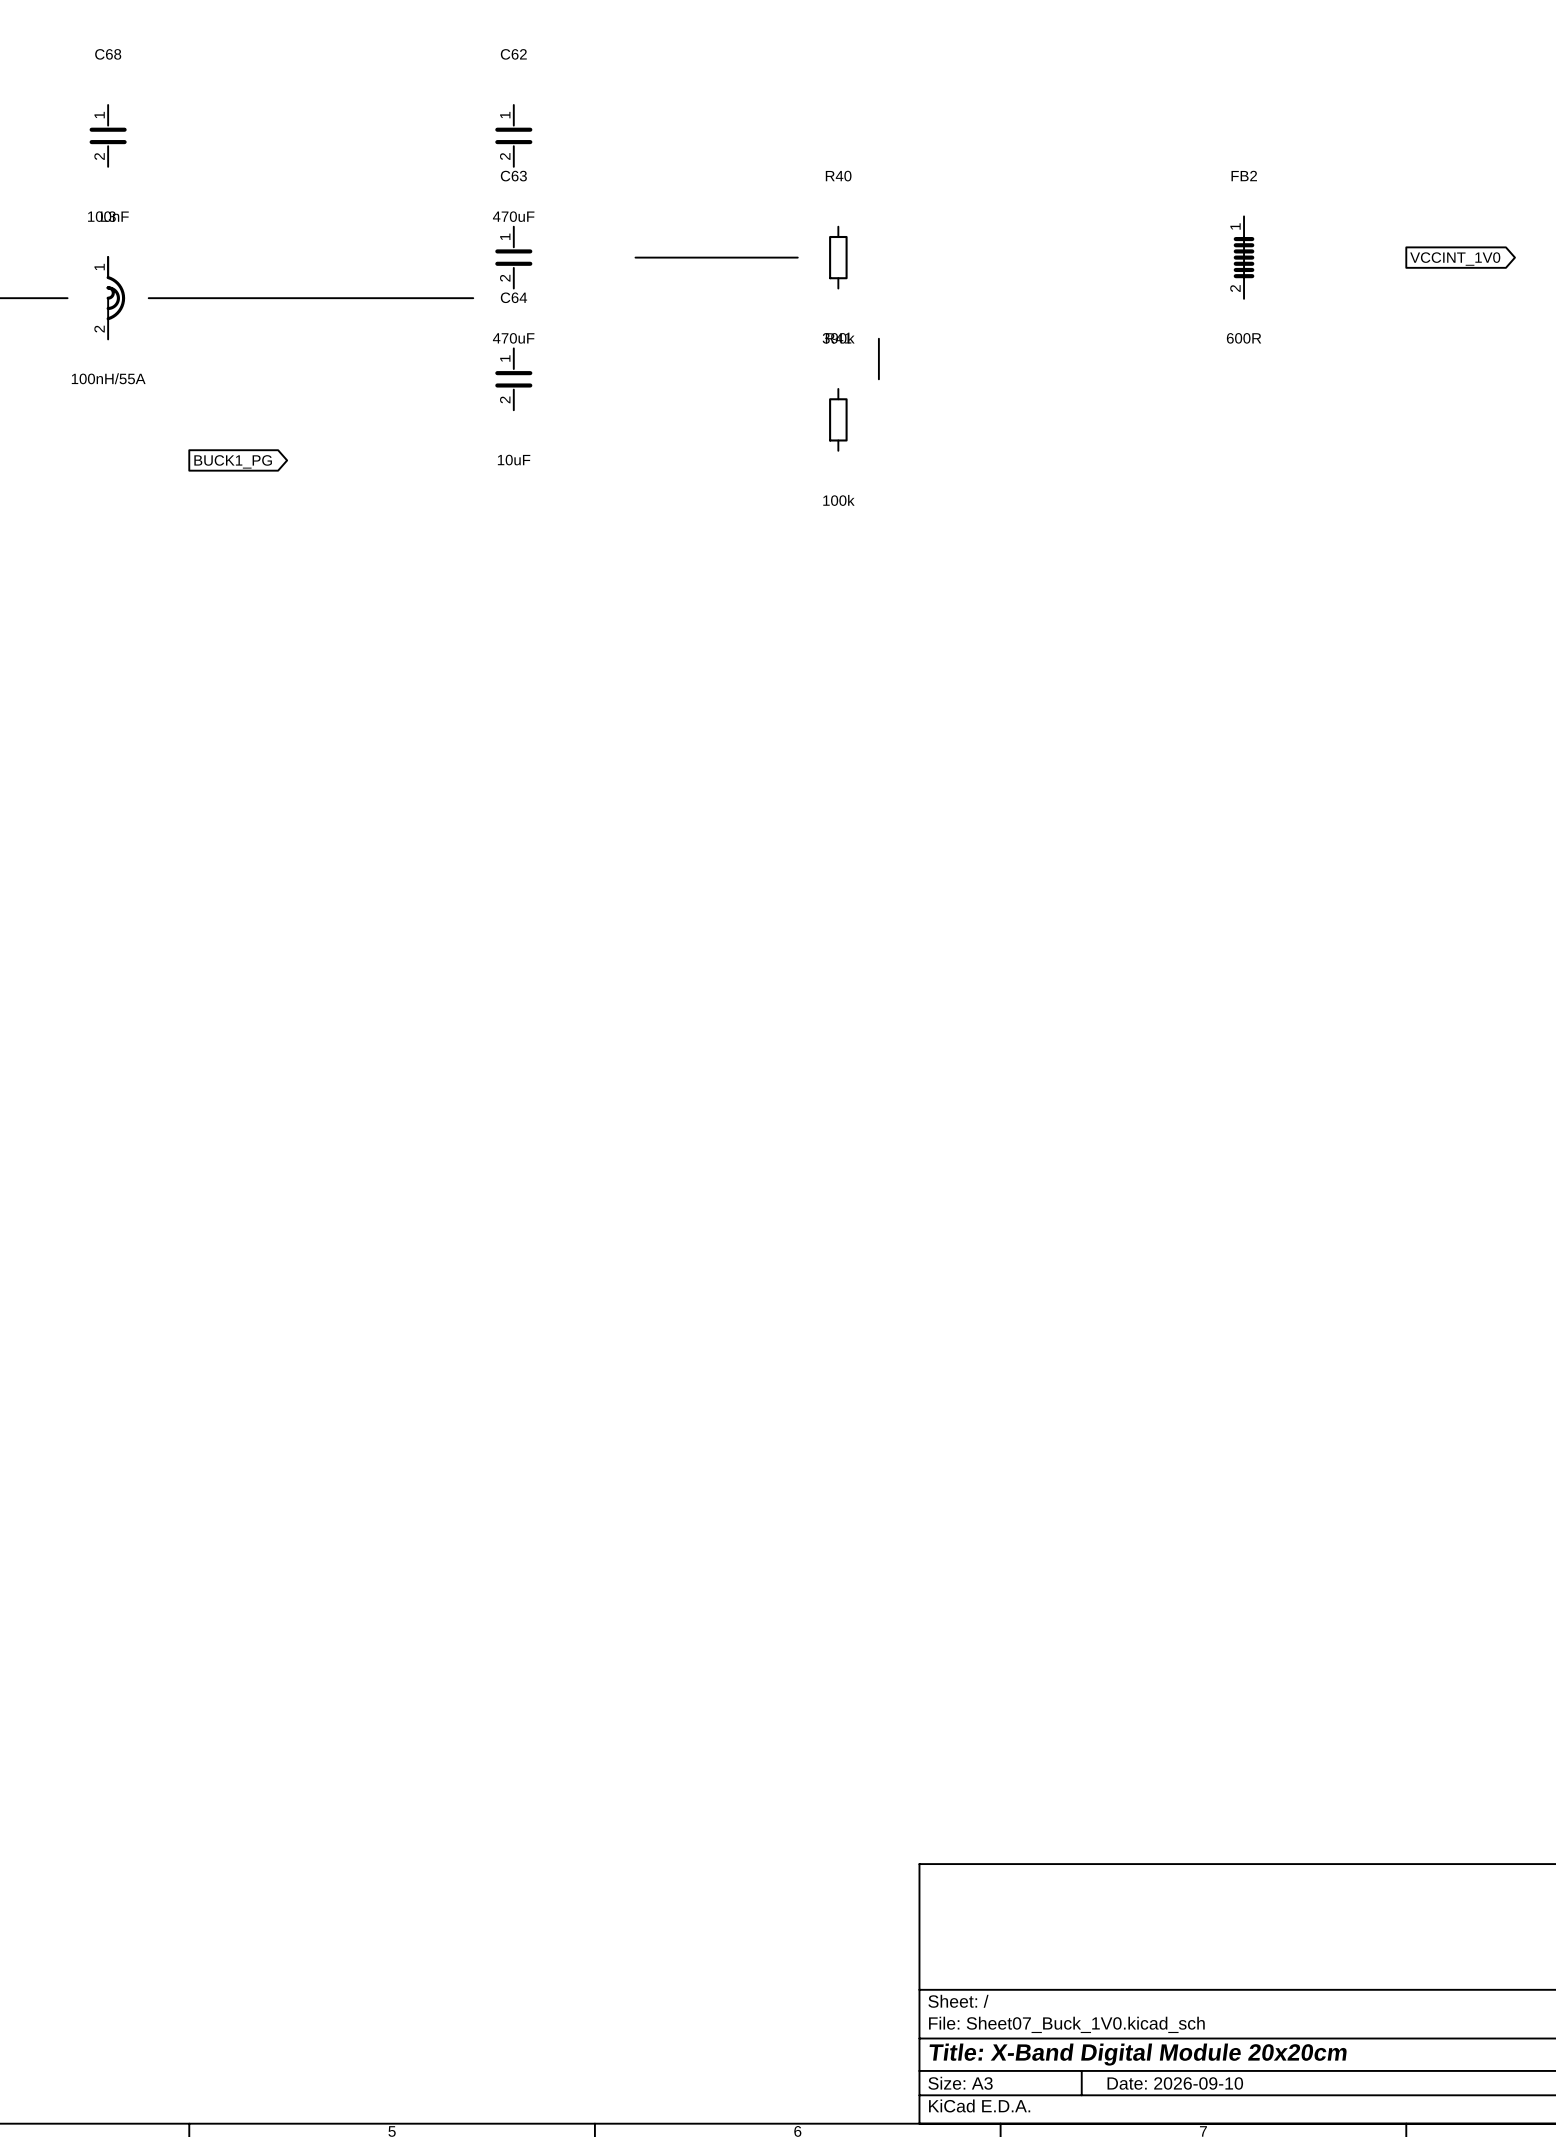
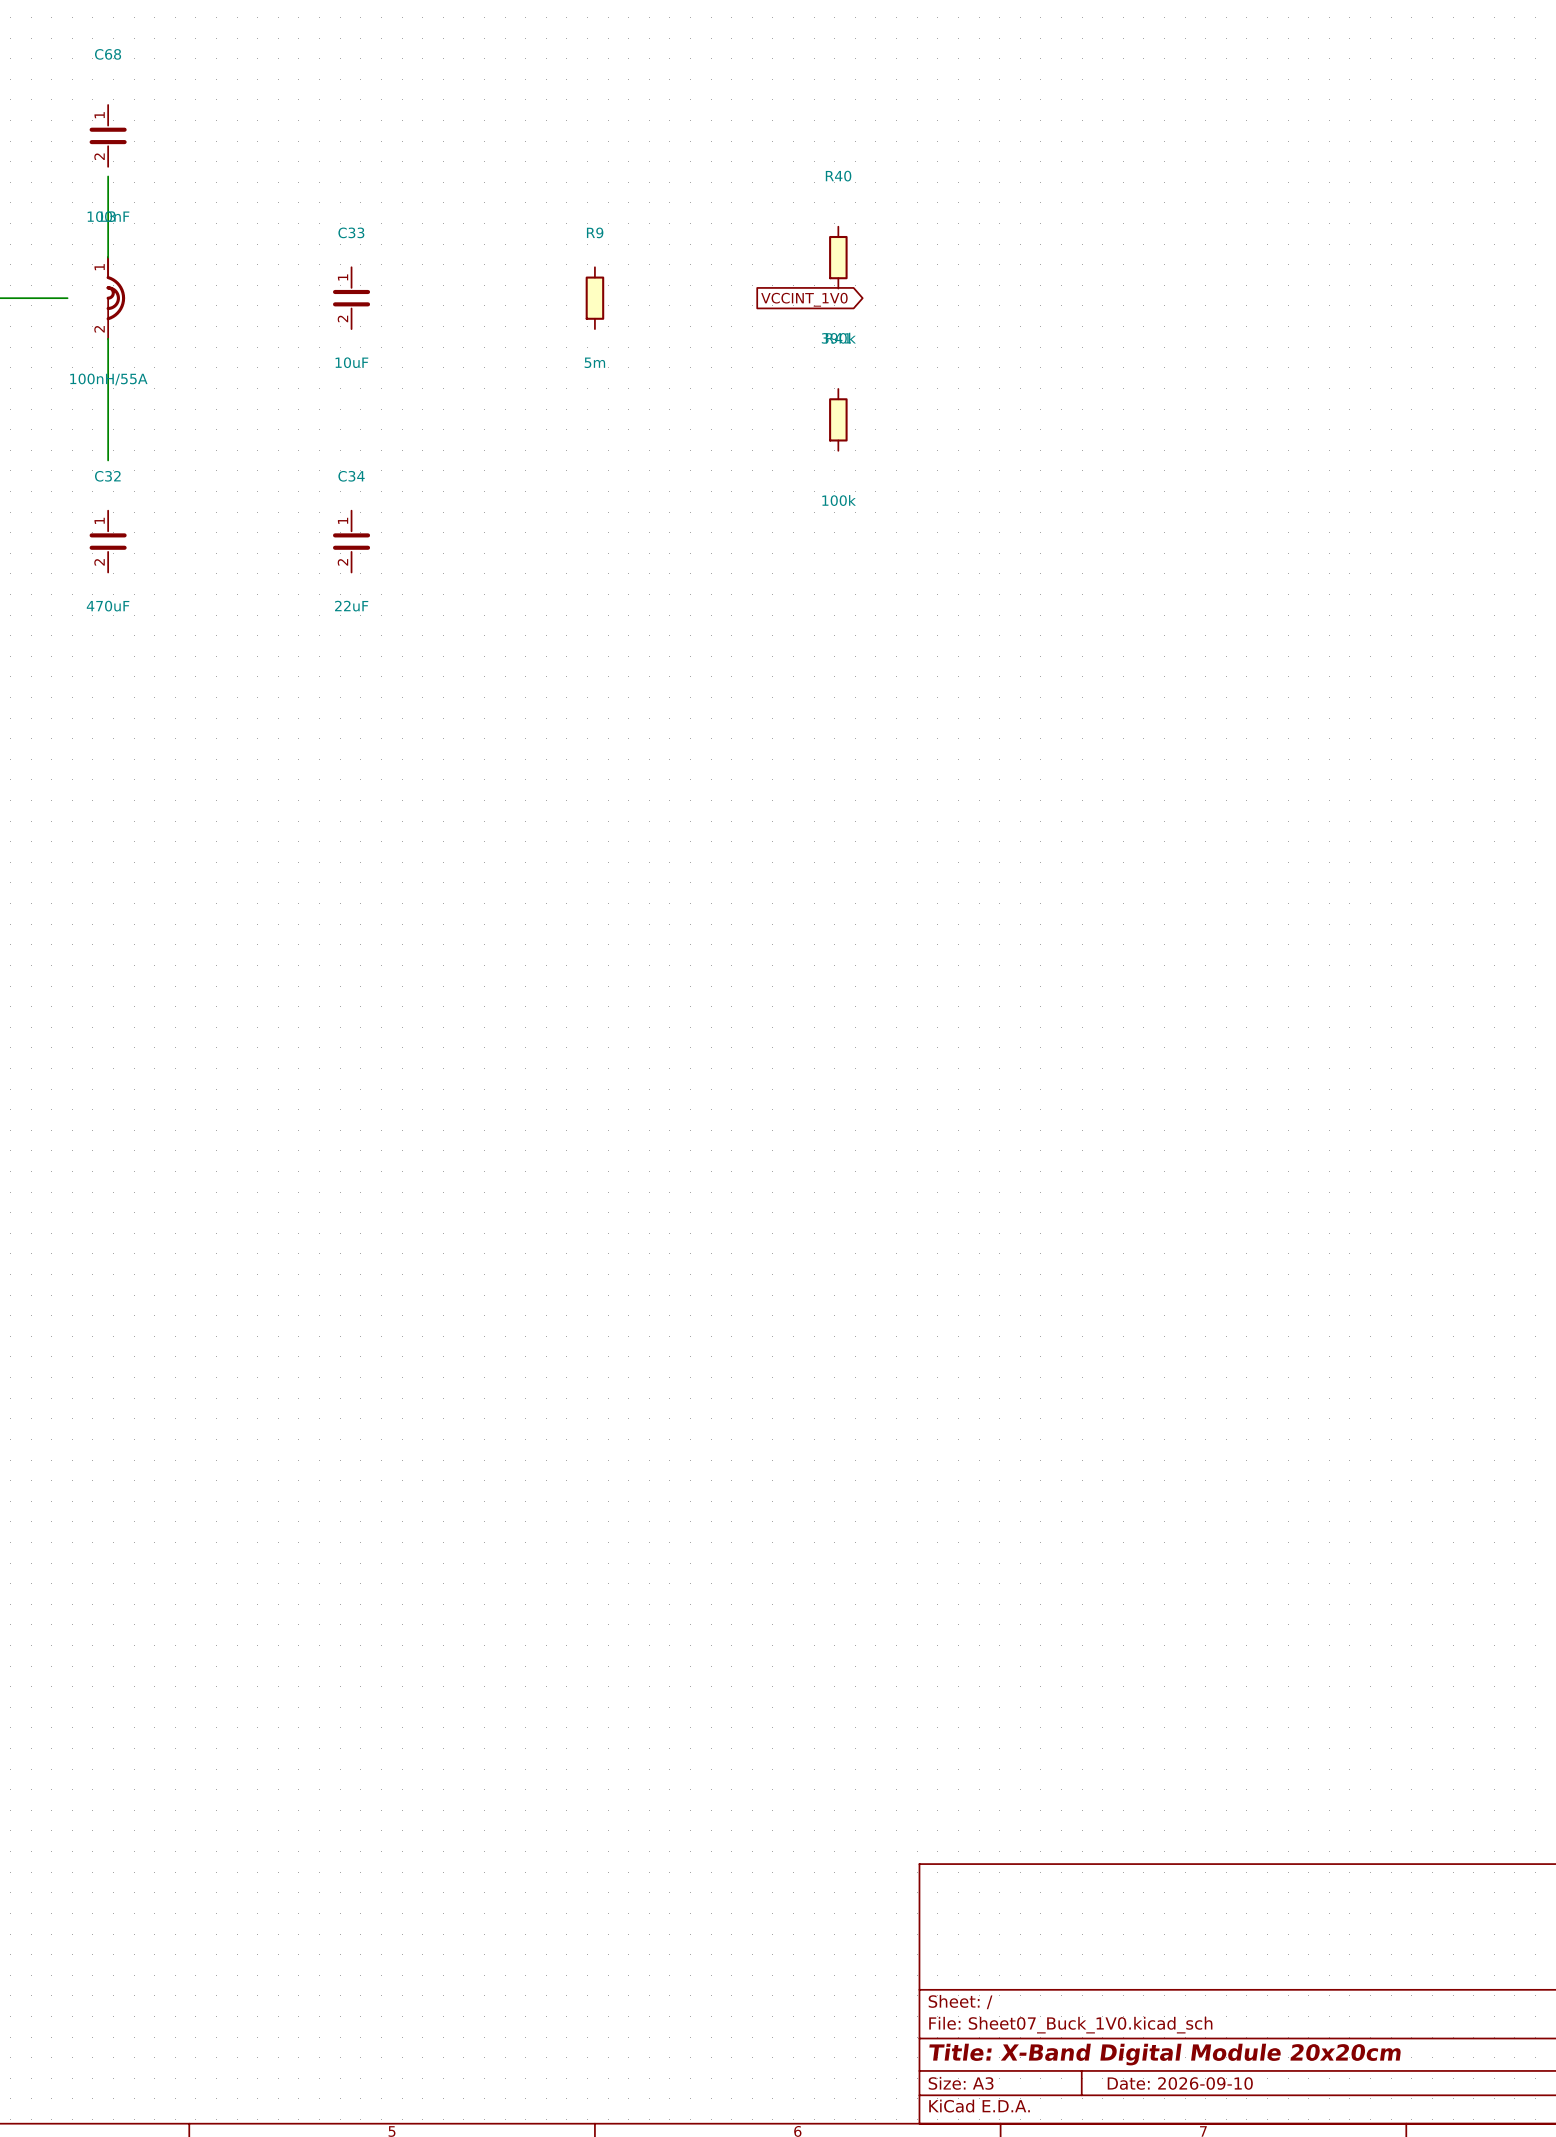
C62: 470uF (513, 135) -> none
wire: none -> (108, 176) (108, 257)
C63: 470uF (513, 257) -> none
wire: (635, 257) (797, 257) -> none
FB2: 600R (1244, 257) -> none
global label: VCCINT_1V0 (1455, 259) -> none
wire: (148, 298) (473, 298) -> none
C33: none -> 10uF (351, 298)
R9: none -> 5m (594, 298)
global label: none -> VCCINT_1V0 (804, 299)
wire: none -> (108, 338) (108, 460)
wire: (878, 338) (878, 379) -> none
C64: 10uF (513, 379) -> none
global label: BUCK1_PG (233, 461) -> none
C32: none -> 470uF (108, 541)
C34: none -> 22uF (351, 541)

